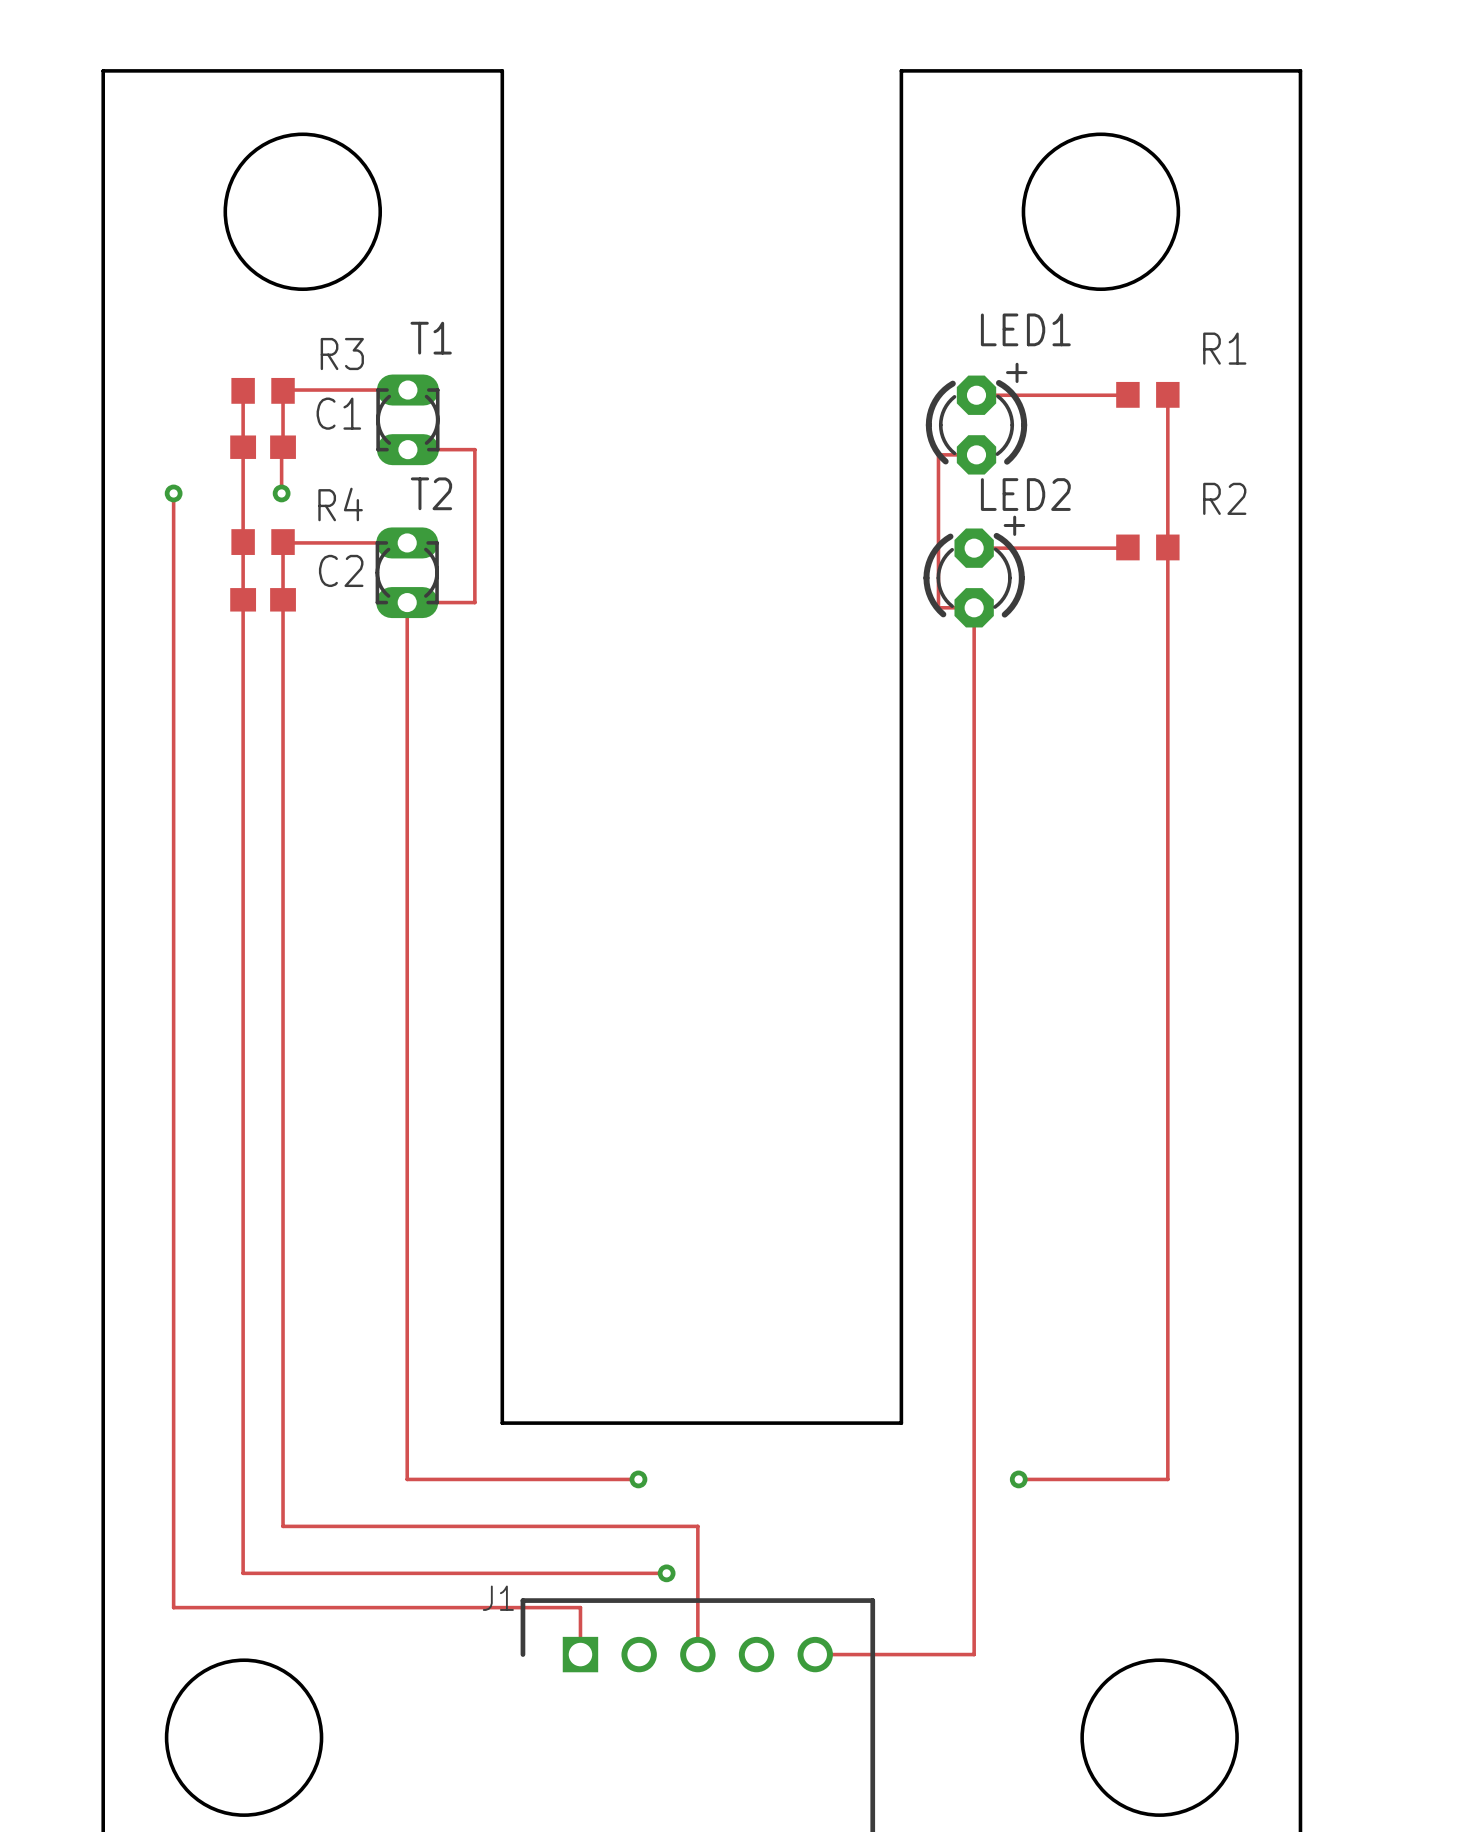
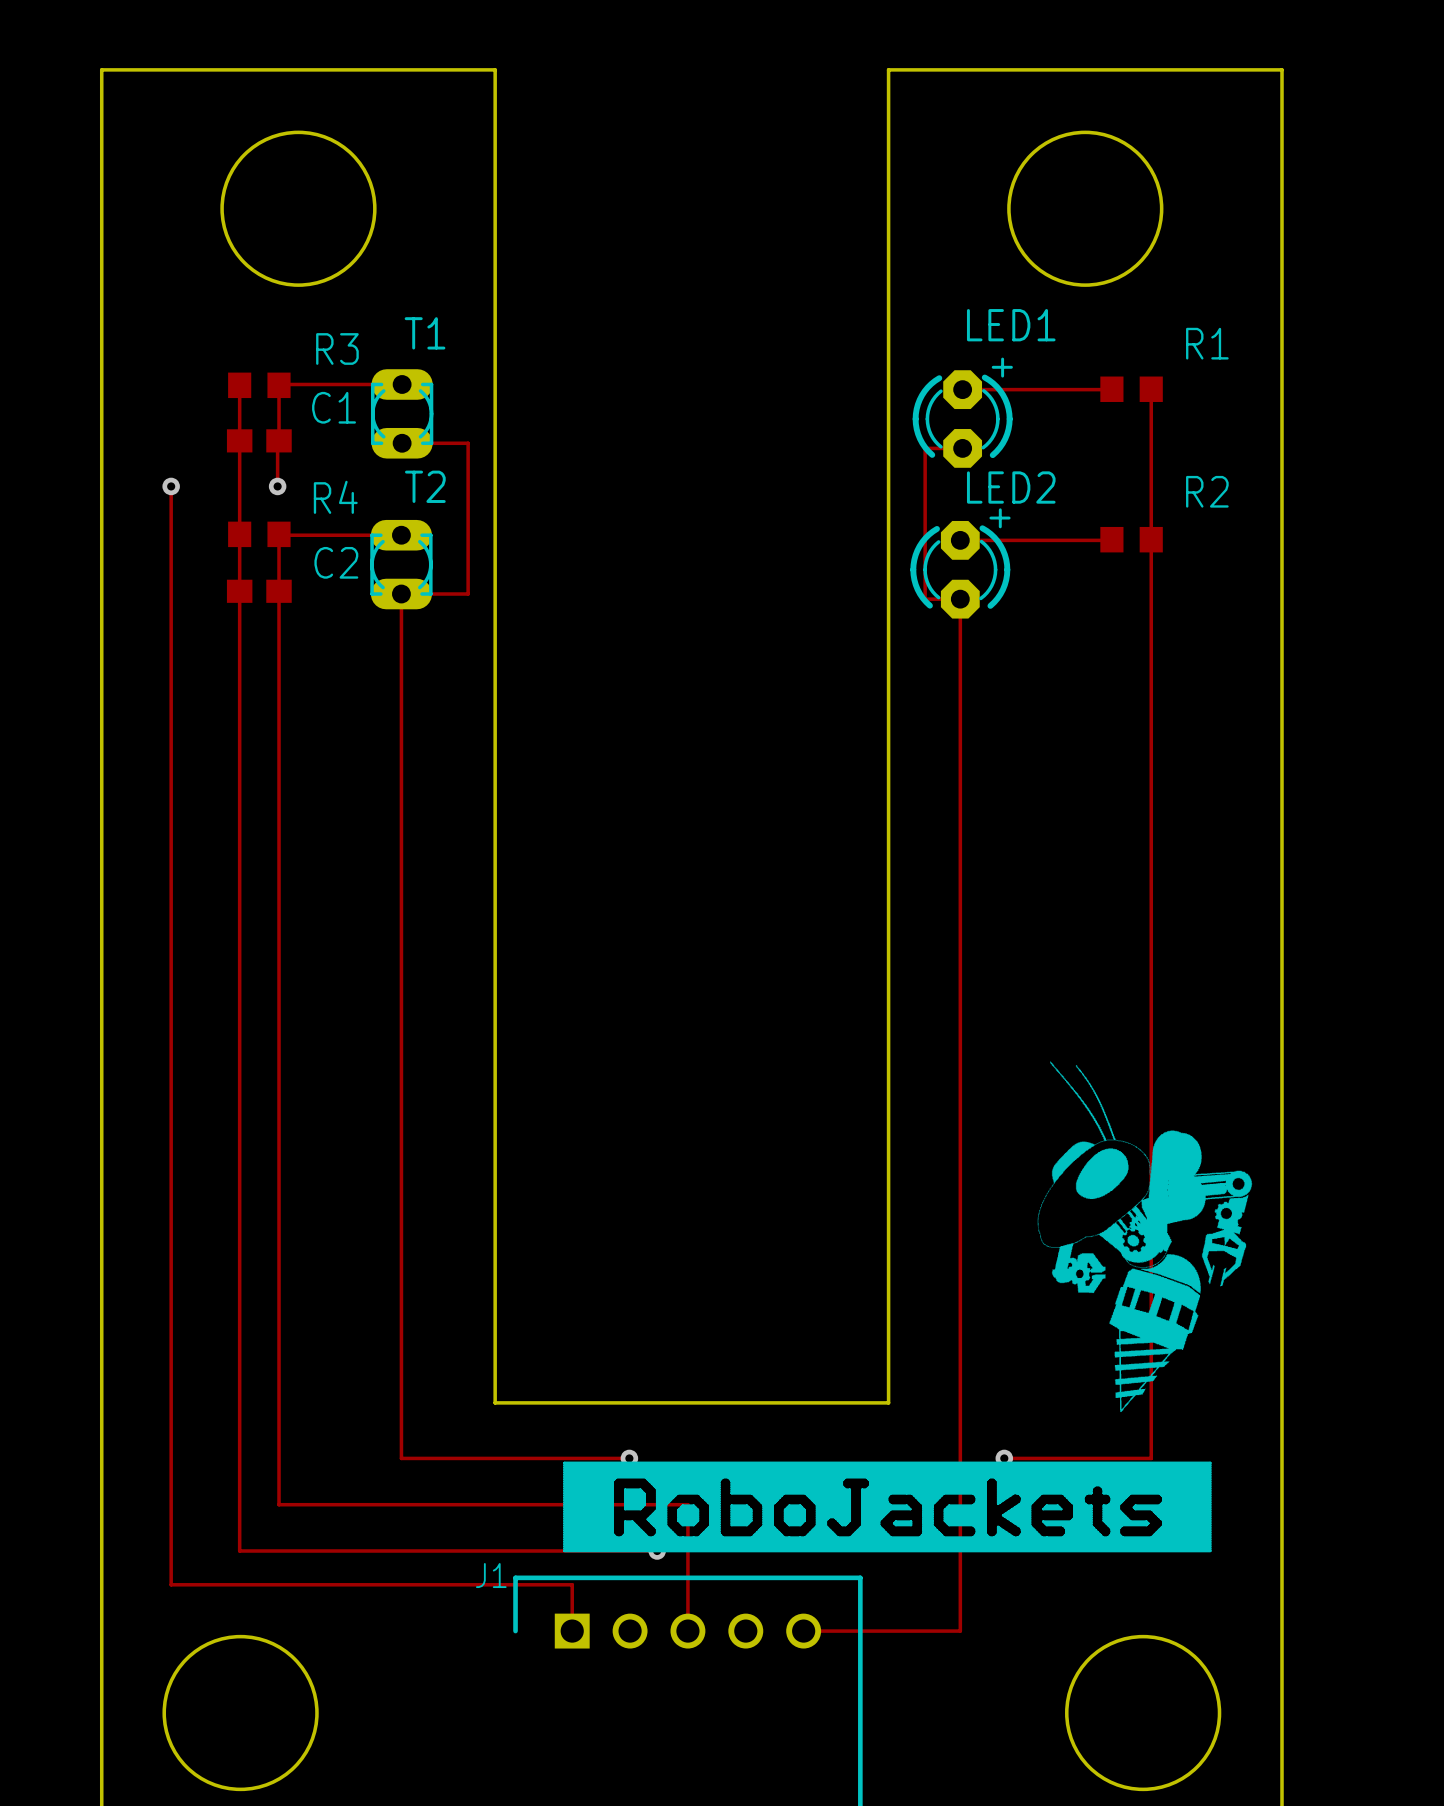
drawing: none -> [1037, 1061, 1253, 1413]
drawing: none -> [563, 1461, 1212, 1553]

